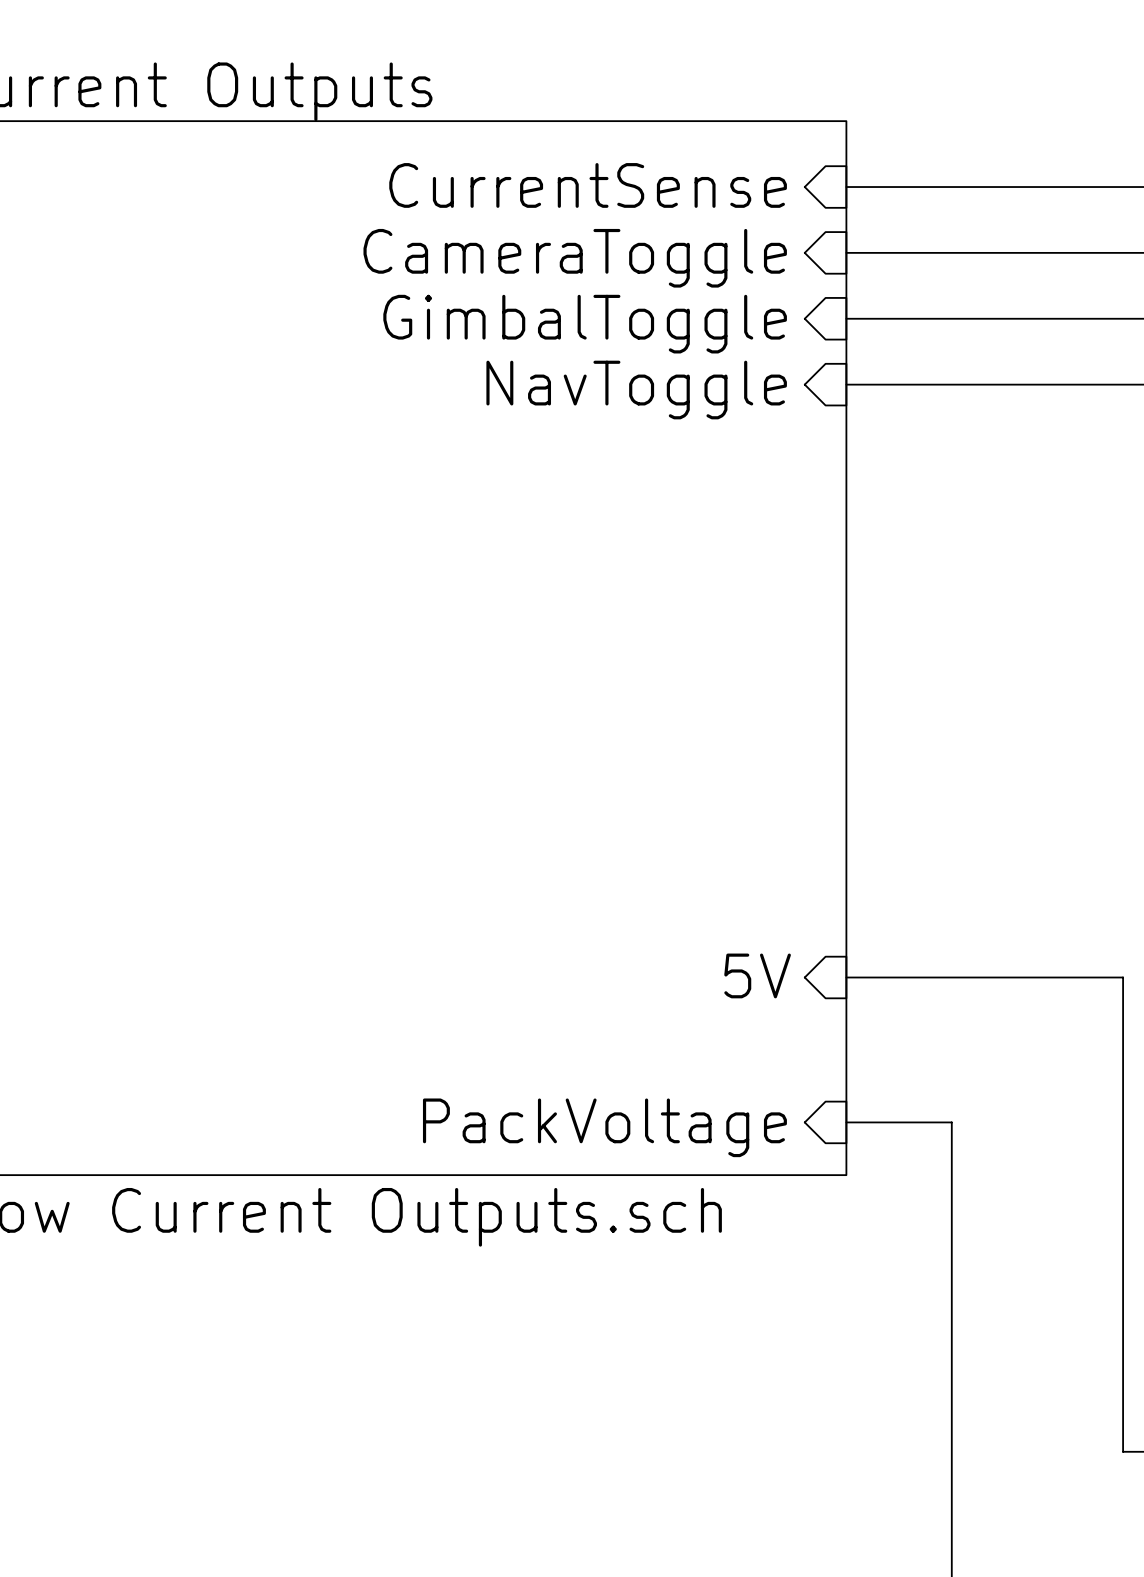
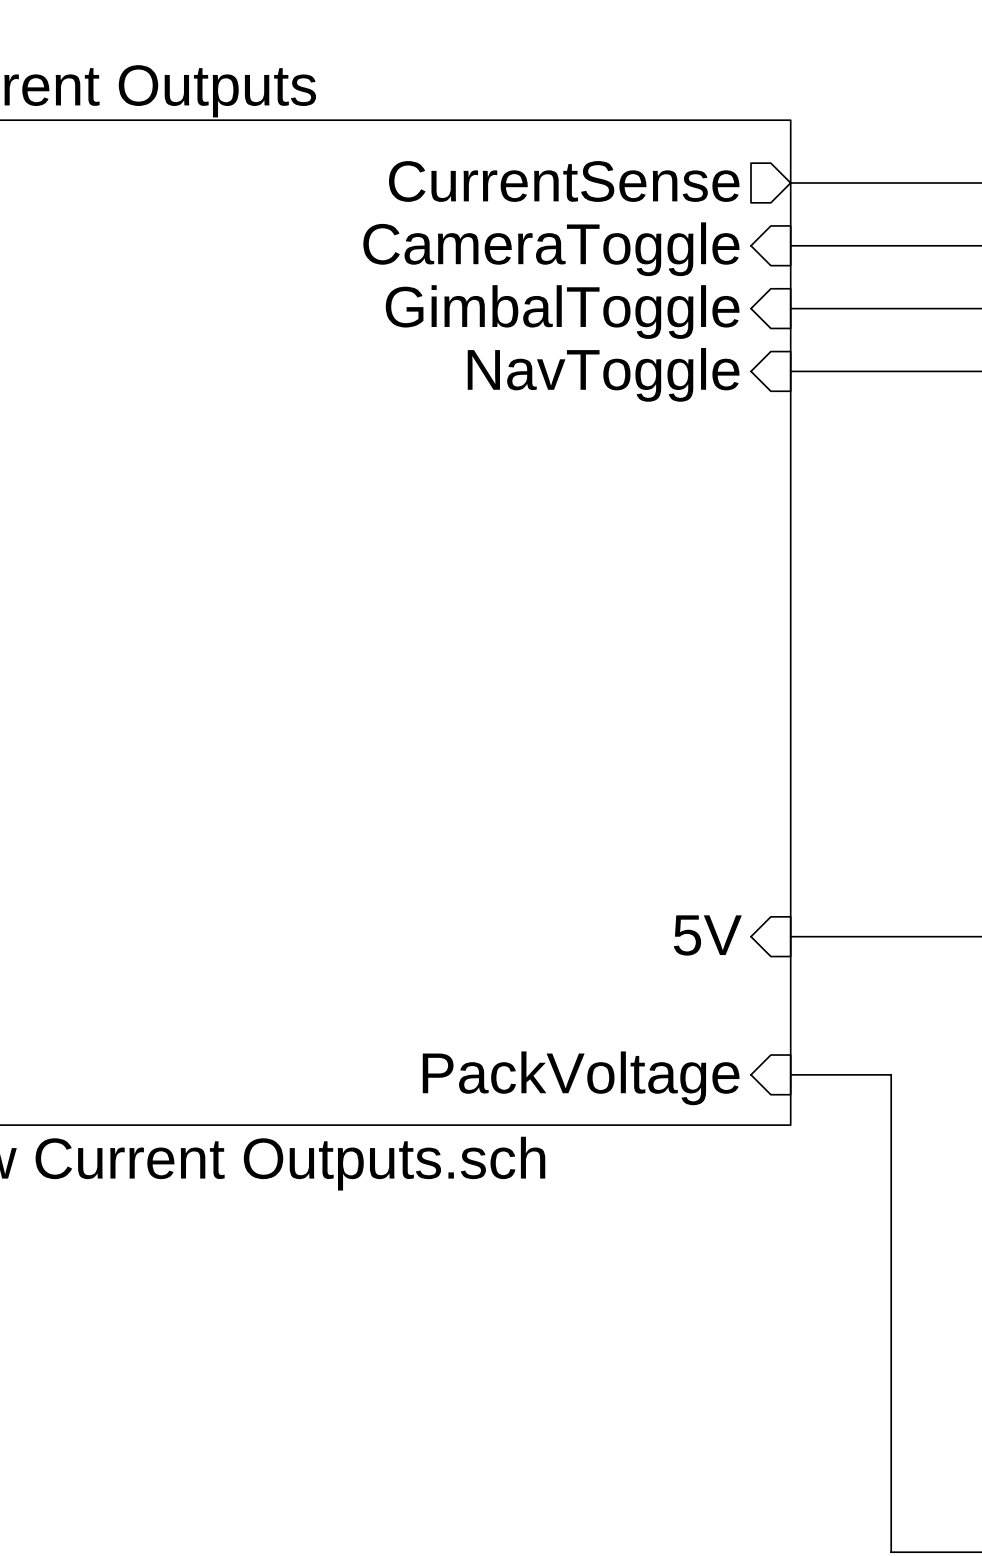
sheet pin shape: input (588, 185) -> output (564, 181)

